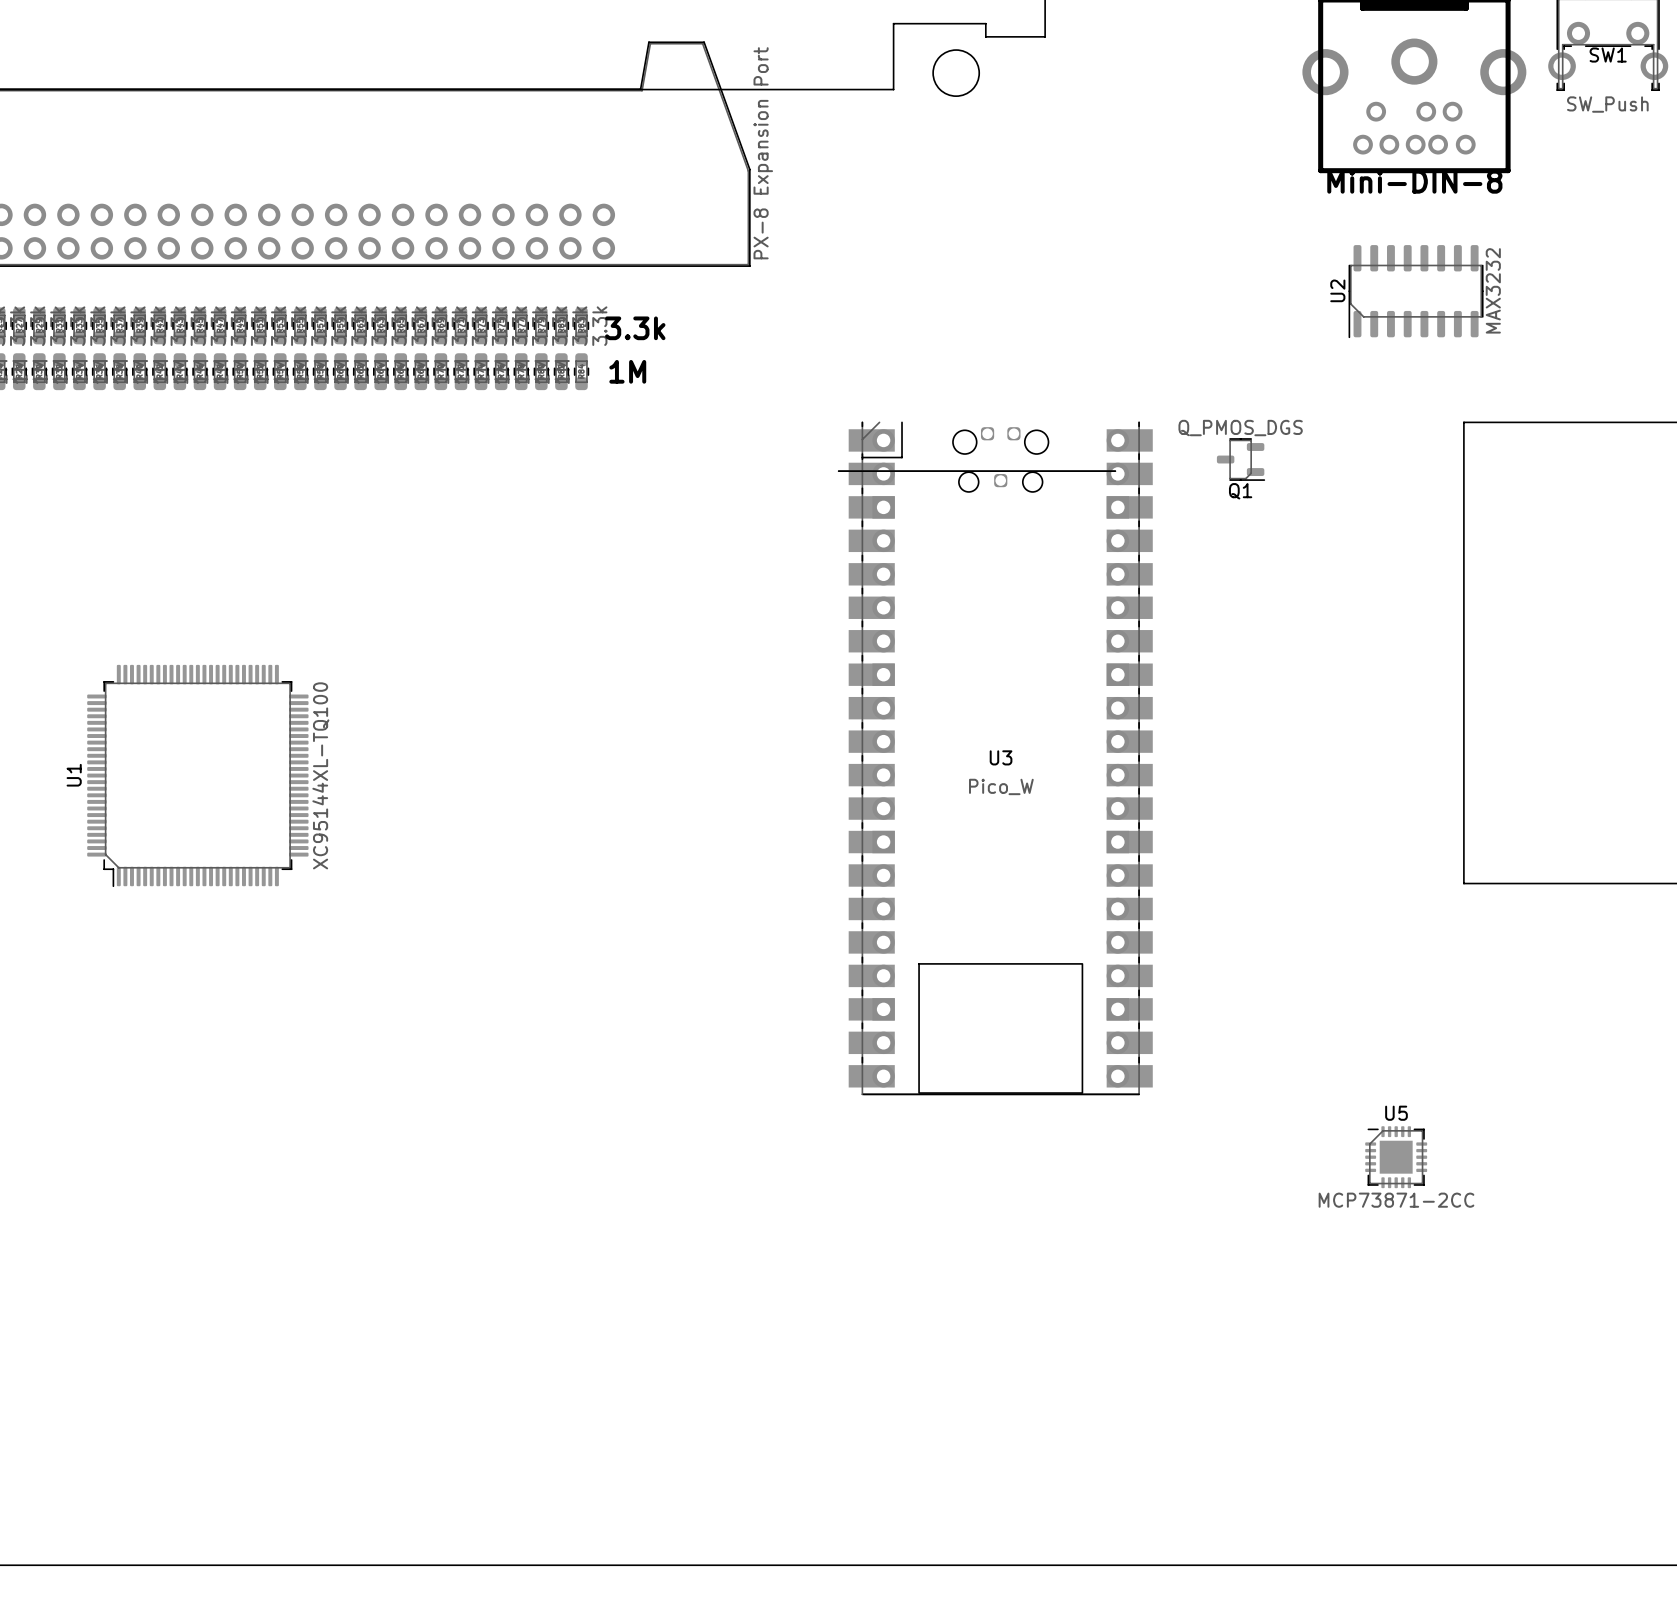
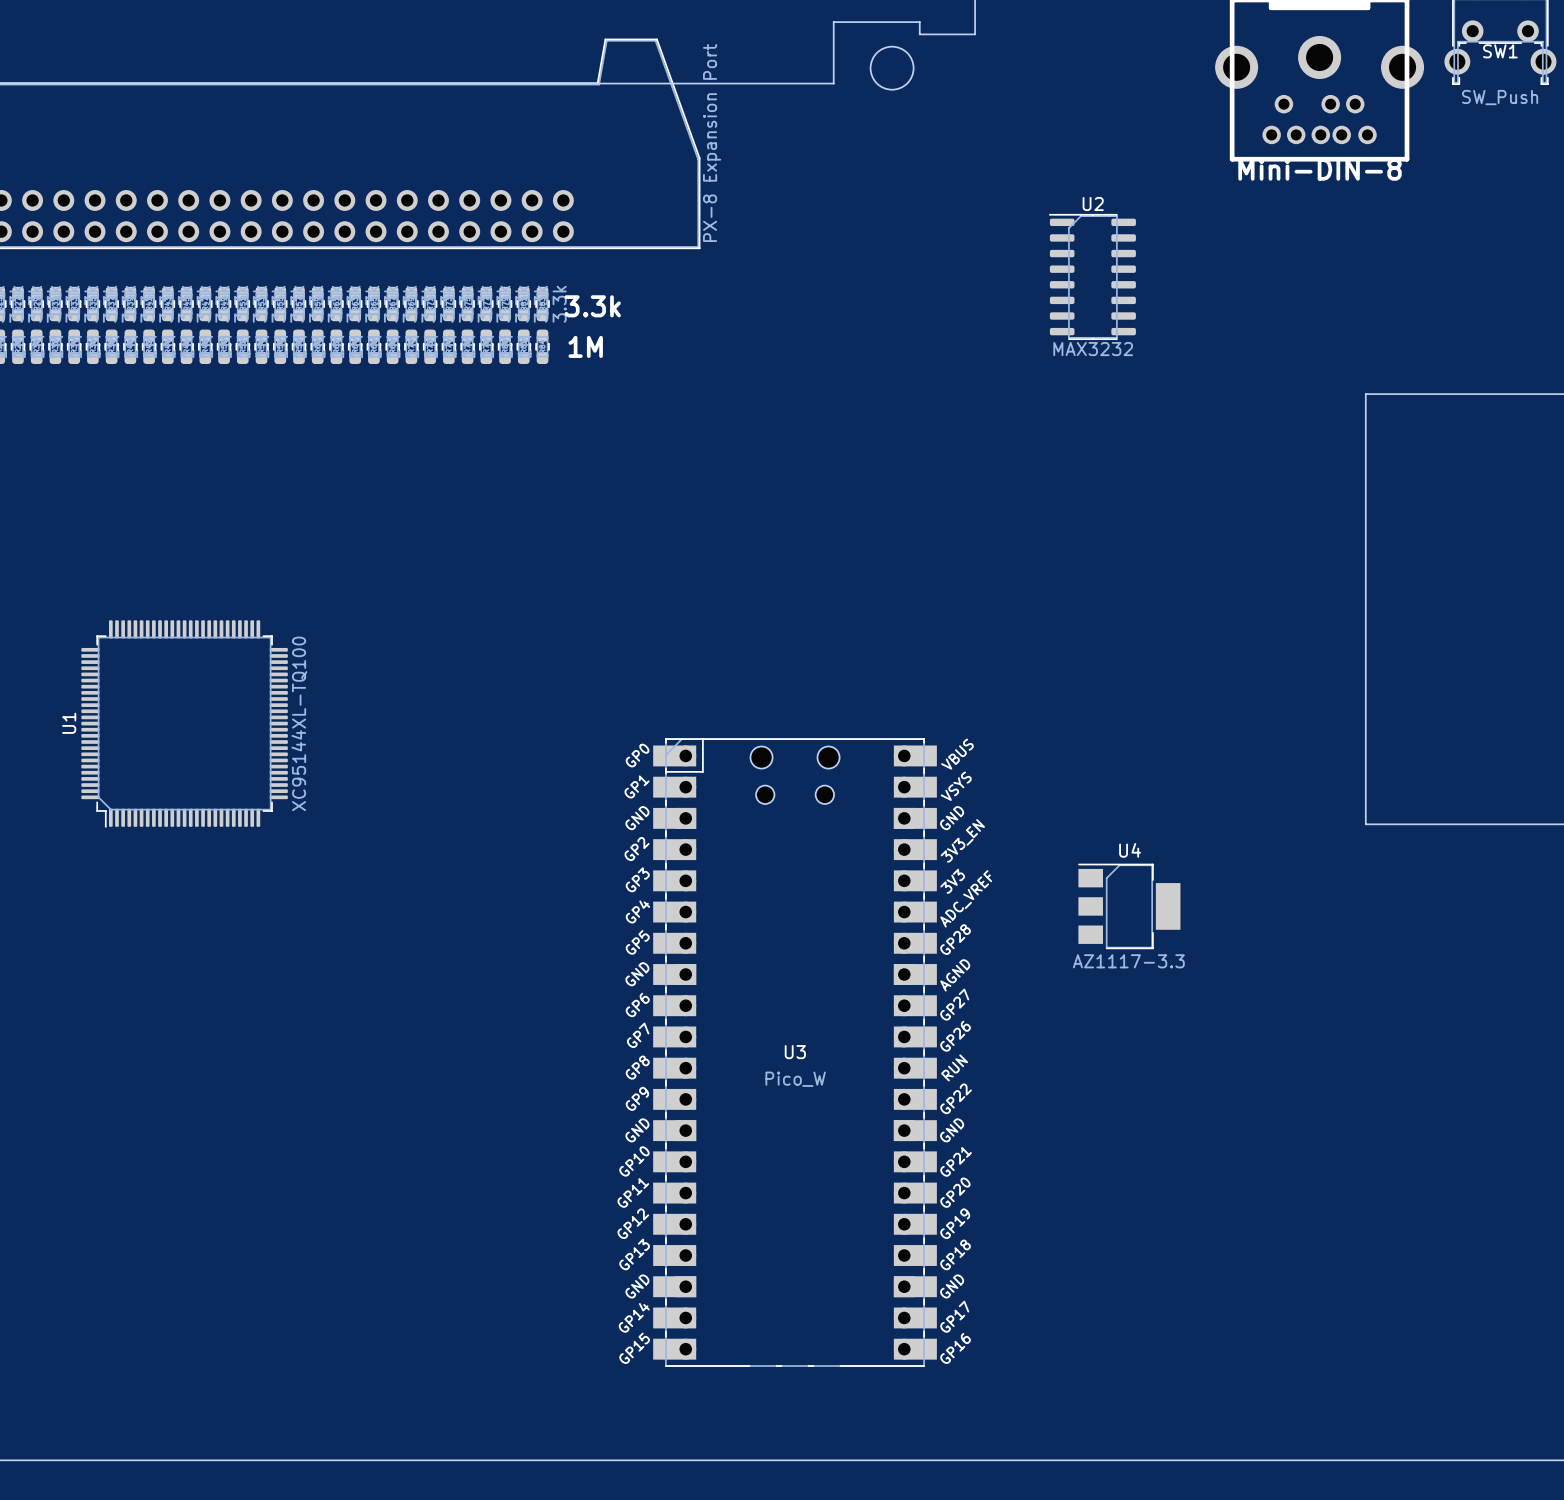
U2 rotation: 0° (1416, 291) -> 90° clockwise (1092, 276)
U2 position: (1416, 291) -> (1092, 276)
U3 footprint: [837, 421, 1153, 1096] -> [653, 738, 937, 1367]
Q1: Q_PMOS_DGS (1241, 459) -> none
U4: none -> AZ1117-3.3 (1129, 906)
U5: MCP73871-2CC (1396, 1157) -> none

